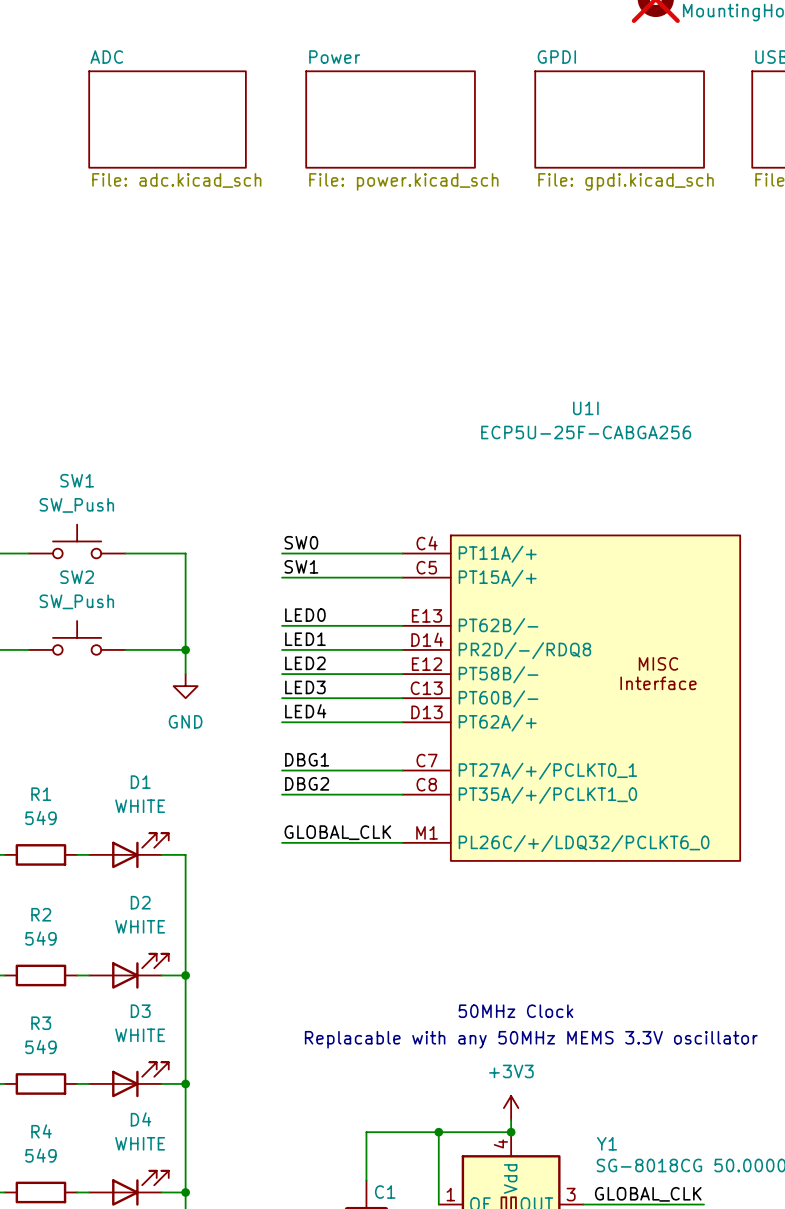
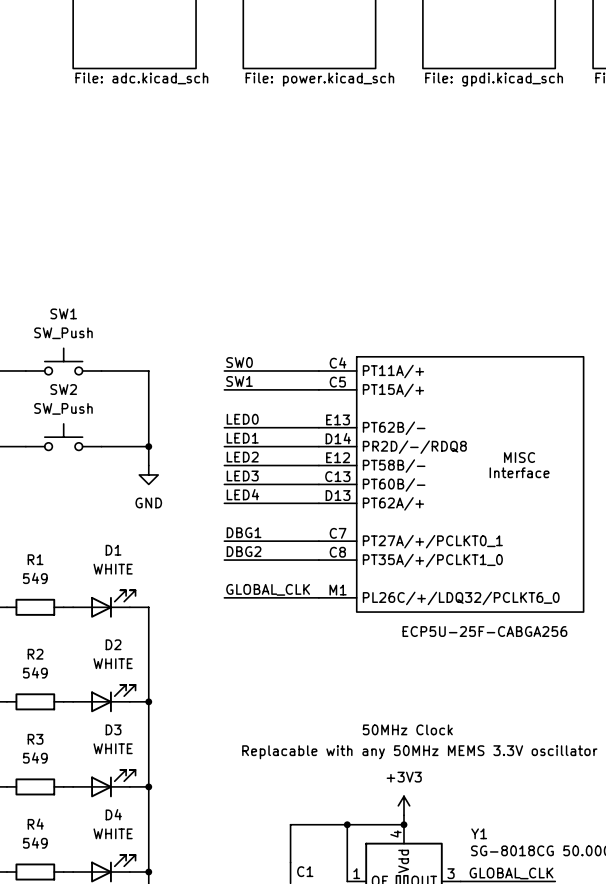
U1I name: U1I (585, 408) -> none
U1I value position: ECP5U-25F-CABGA256 (586, 432) -> ECP5U-25F-CABGA256 (484, 631)

